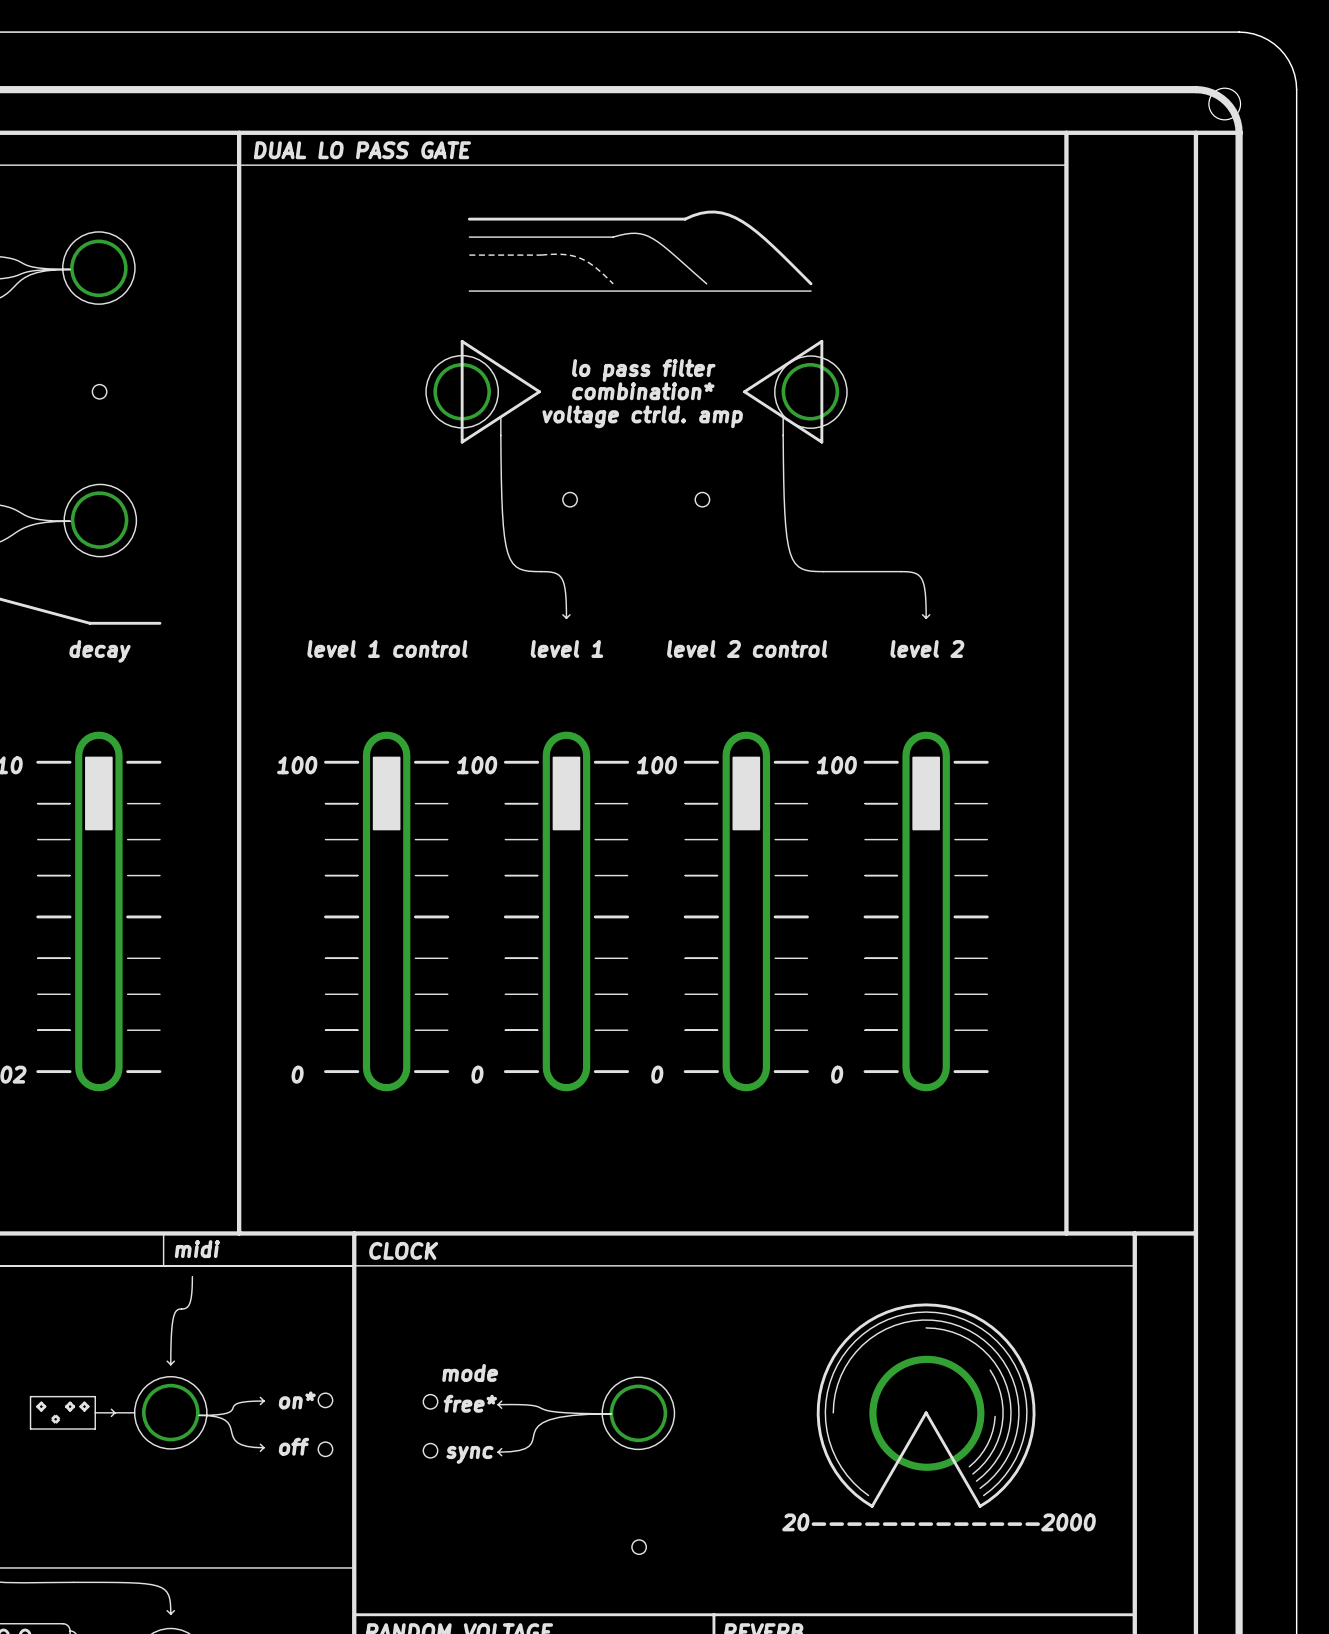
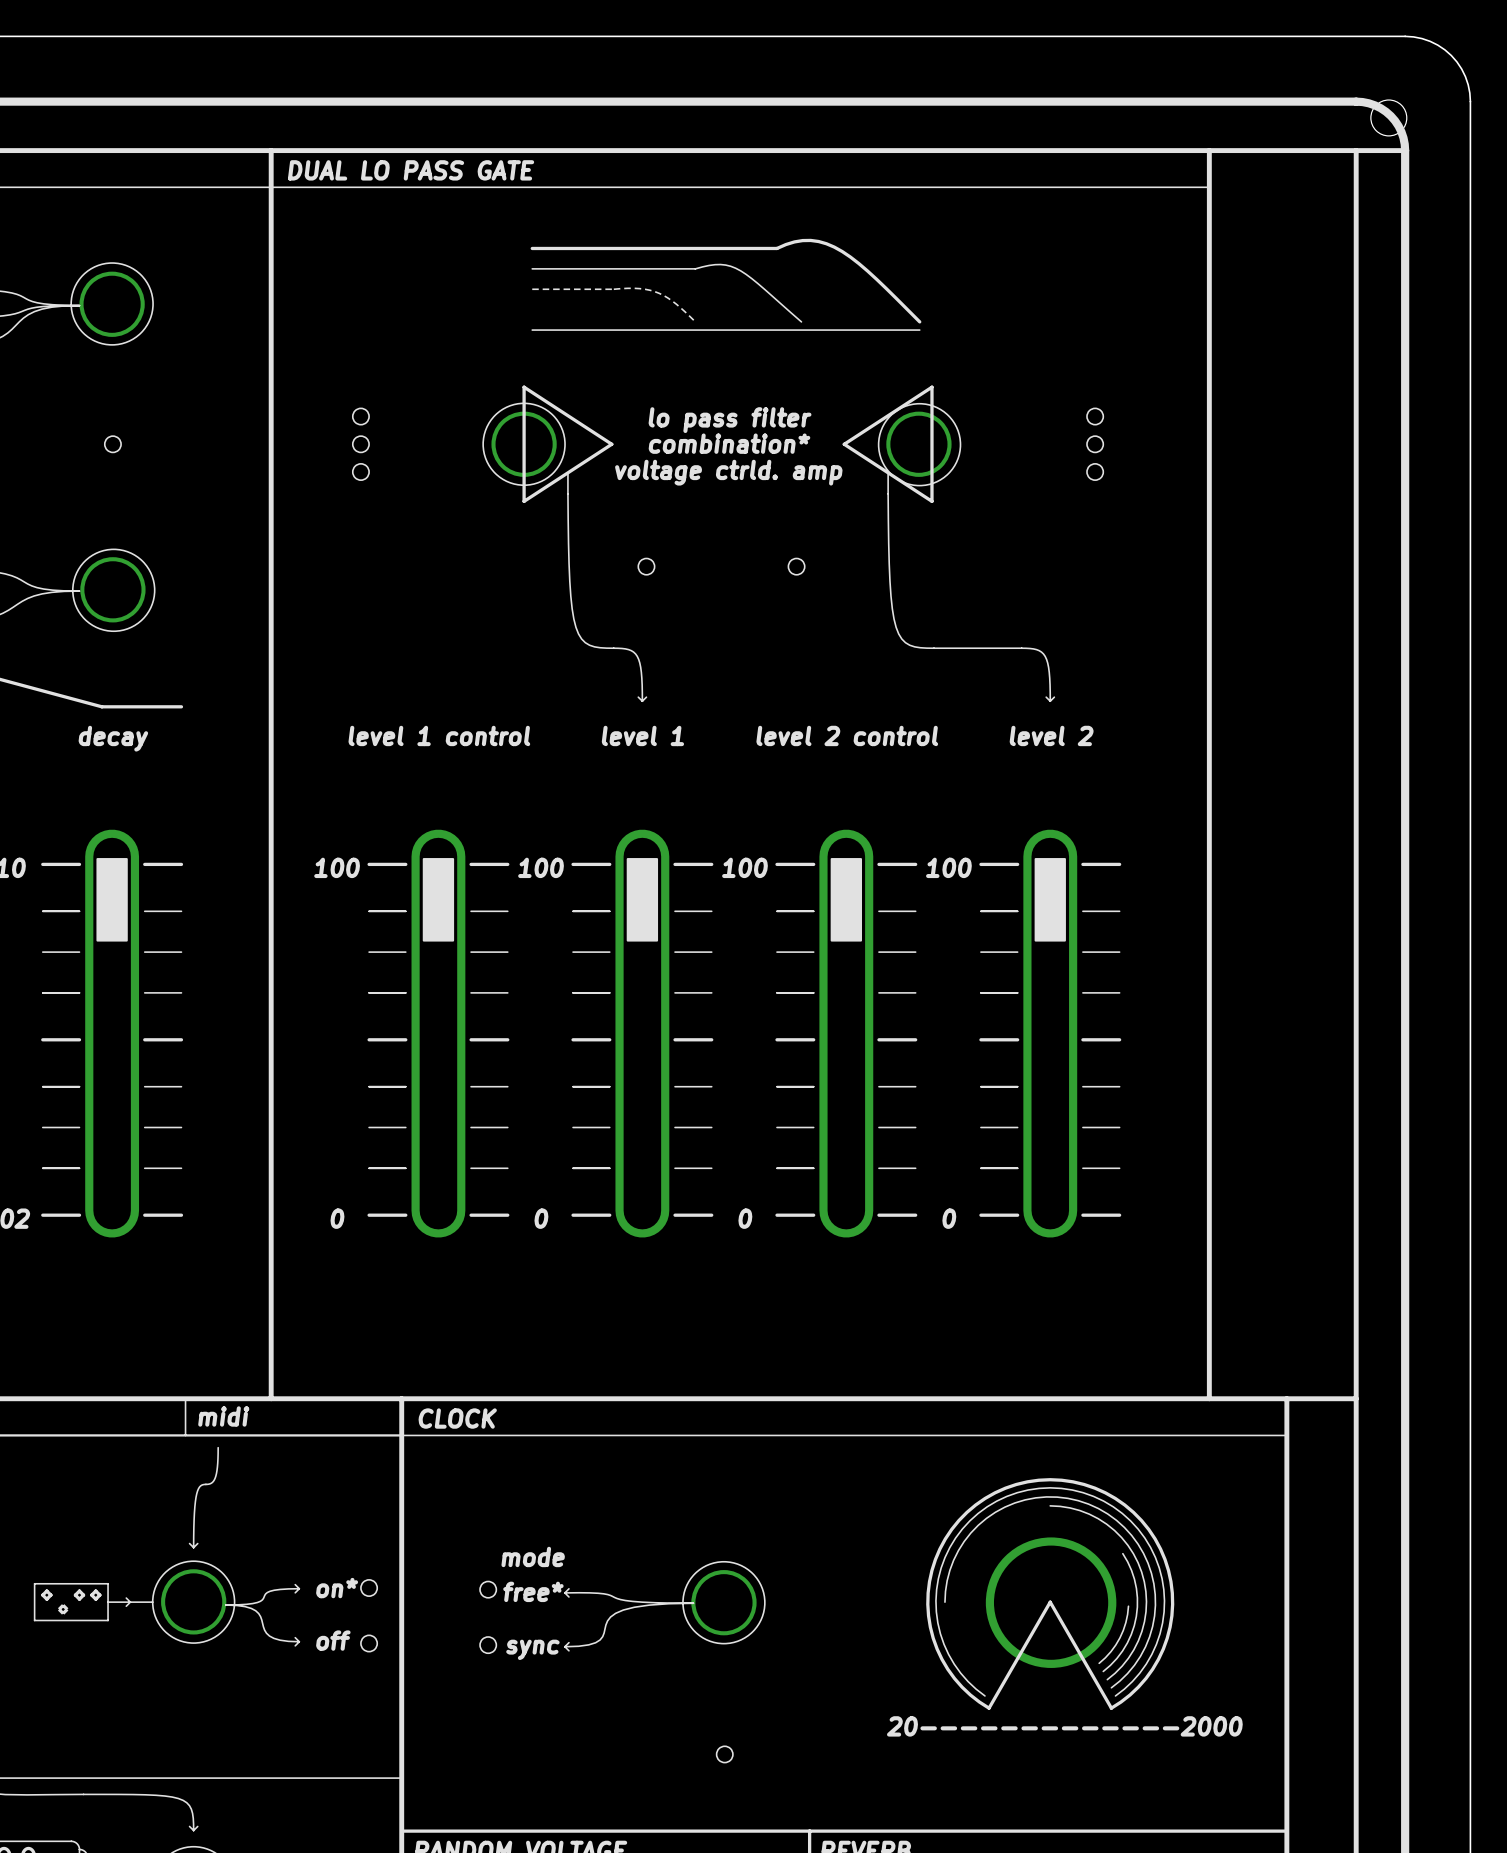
drawing: none -> [351, 407, 370, 481]
drawing: none -> [1086, 407, 1105, 481]

